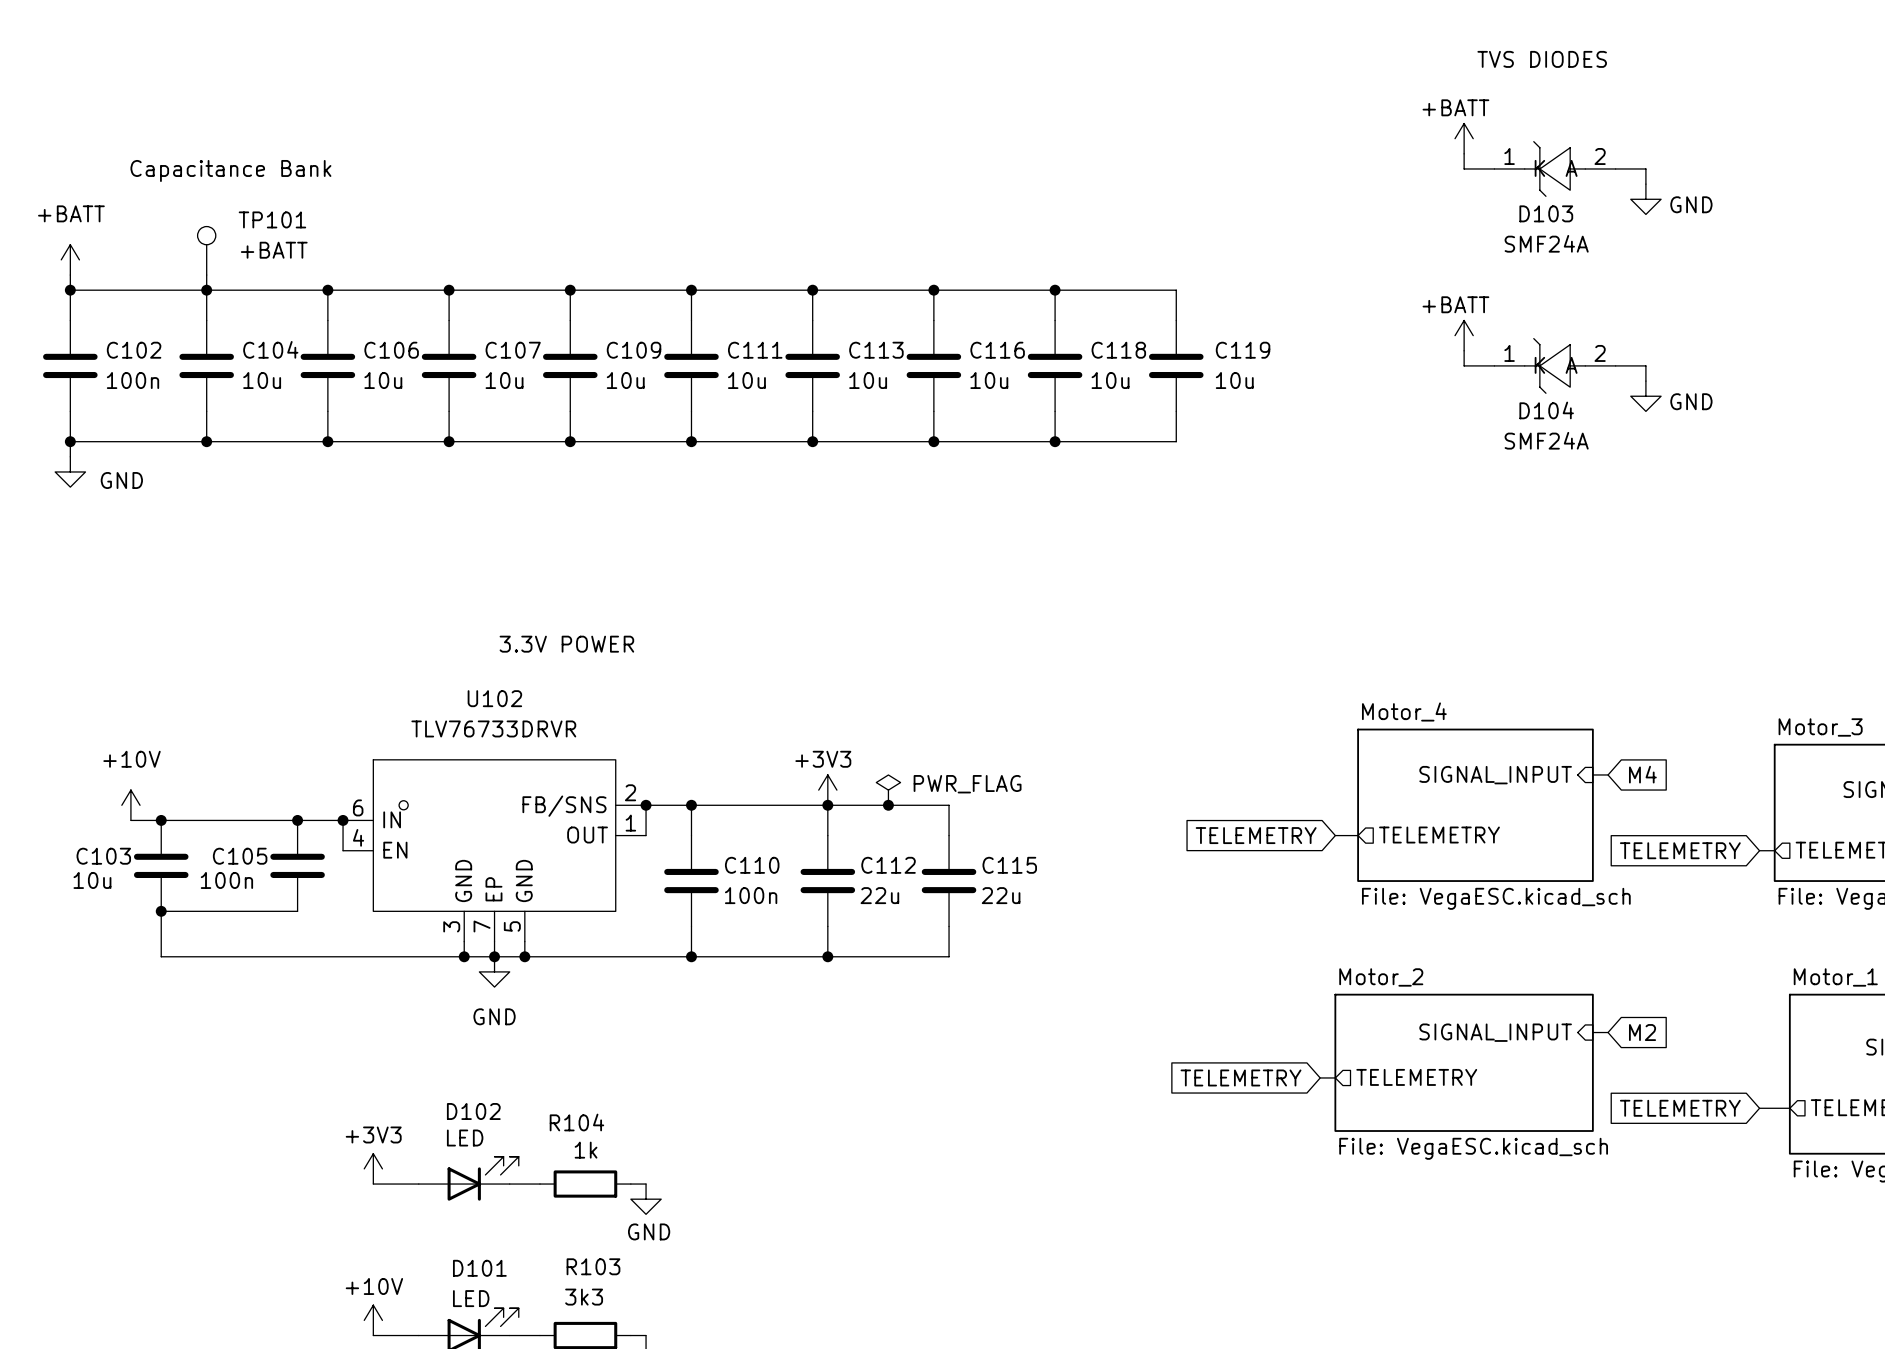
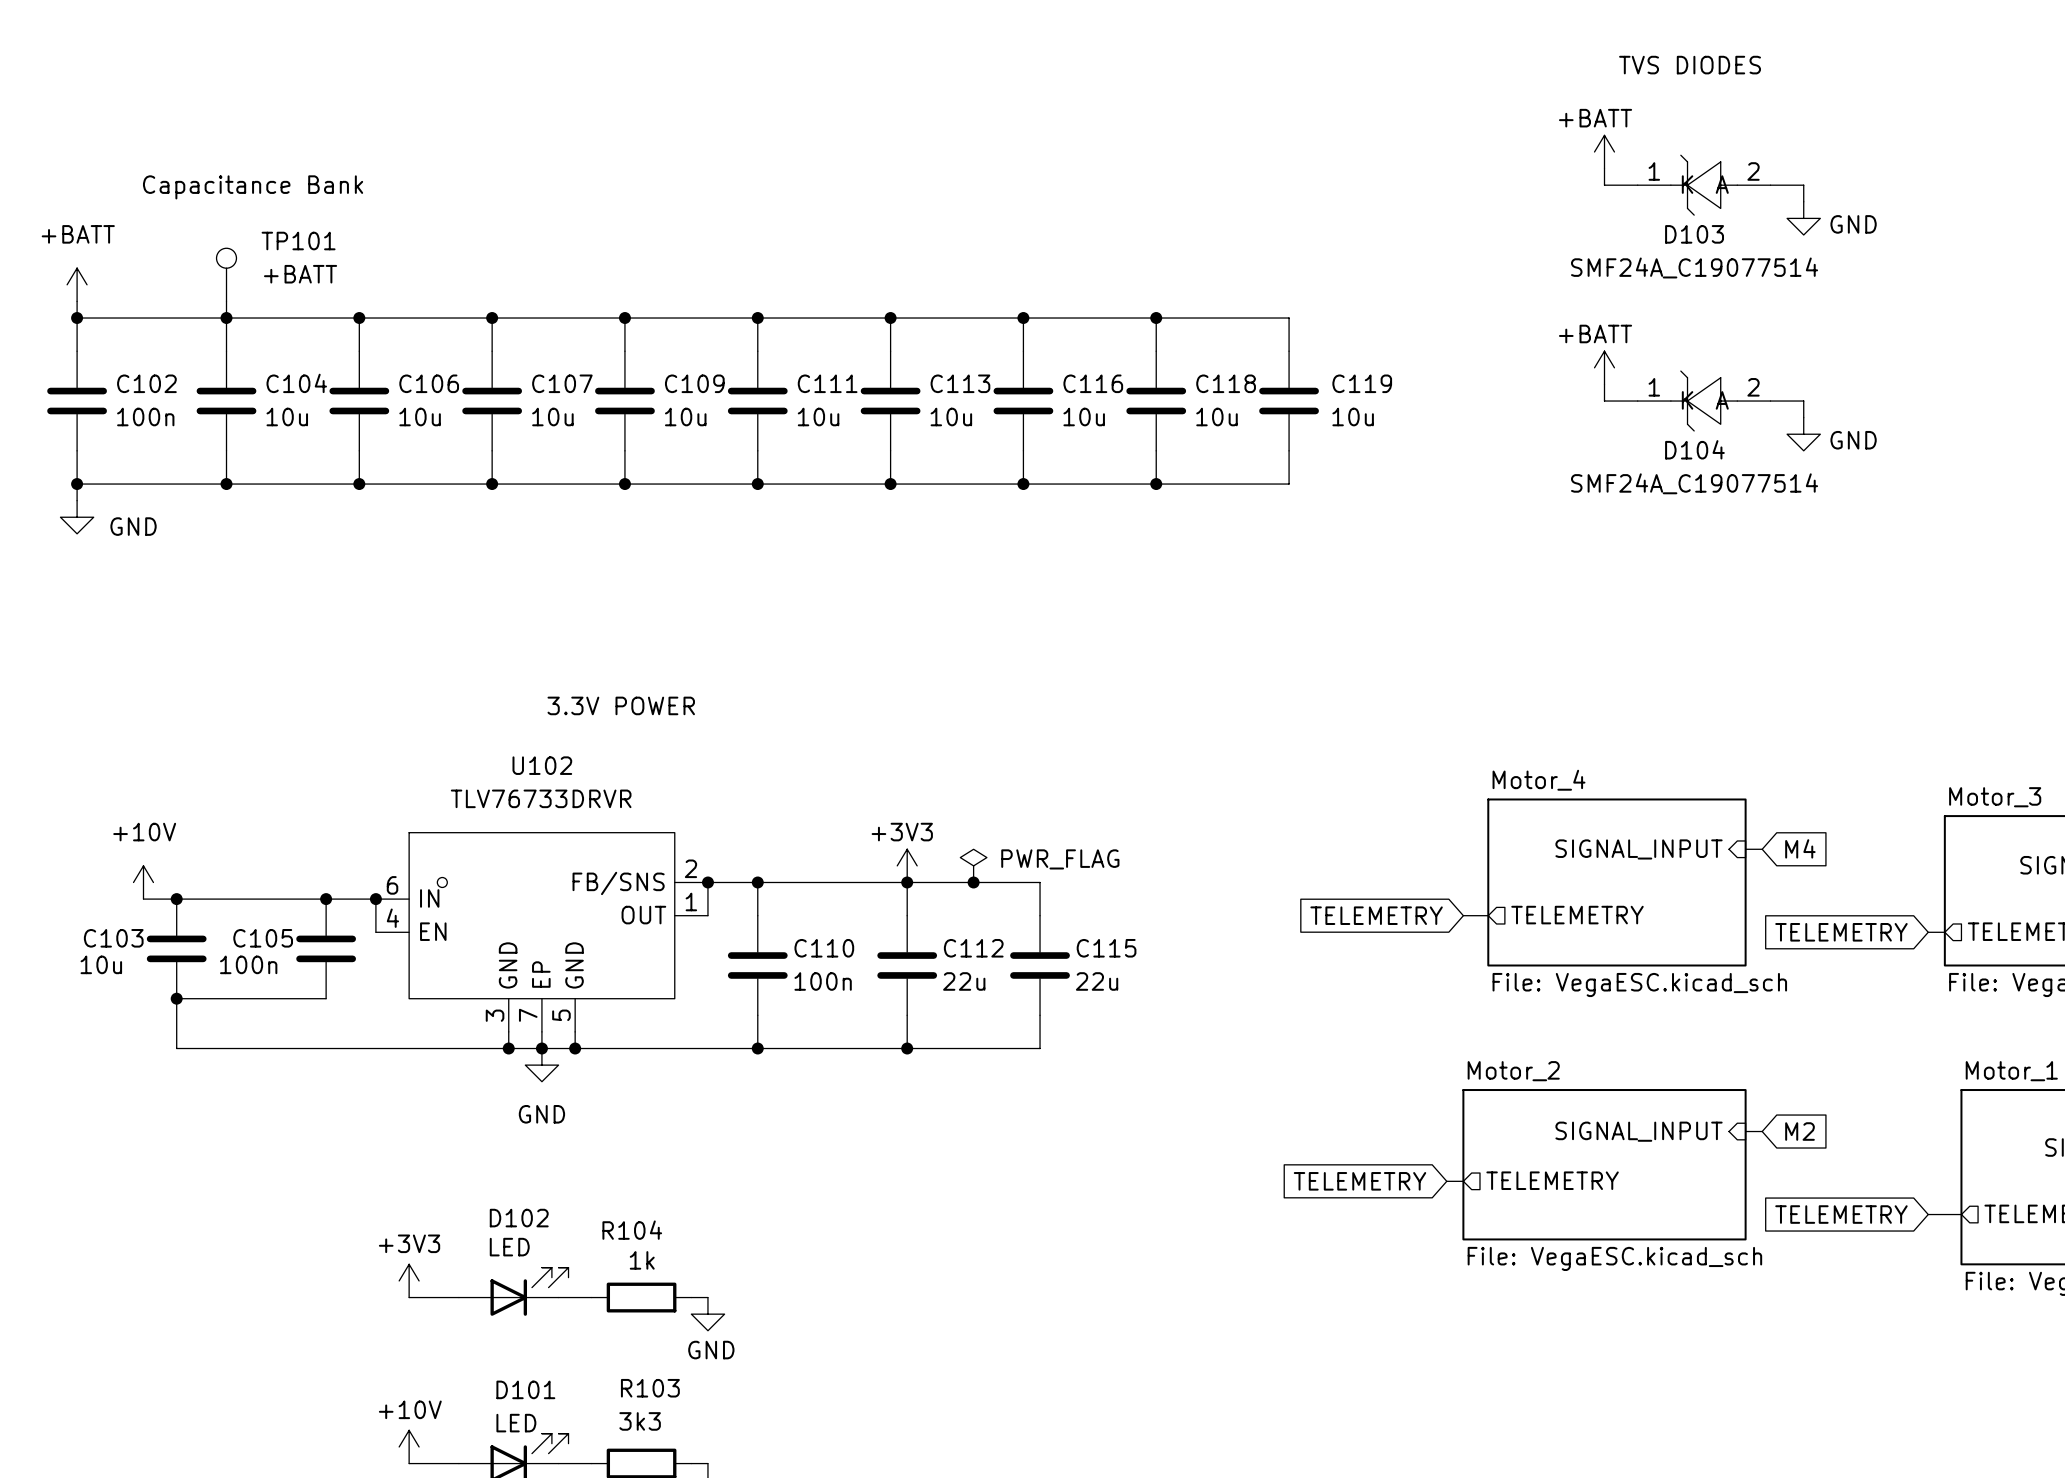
D103 value: SMF24A (1546, 243) -> SMF24A_C19077514 (1694, 267)
D104 value: SMF24A (1546, 440) -> SMF24A_C19077514 (1694, 483)

